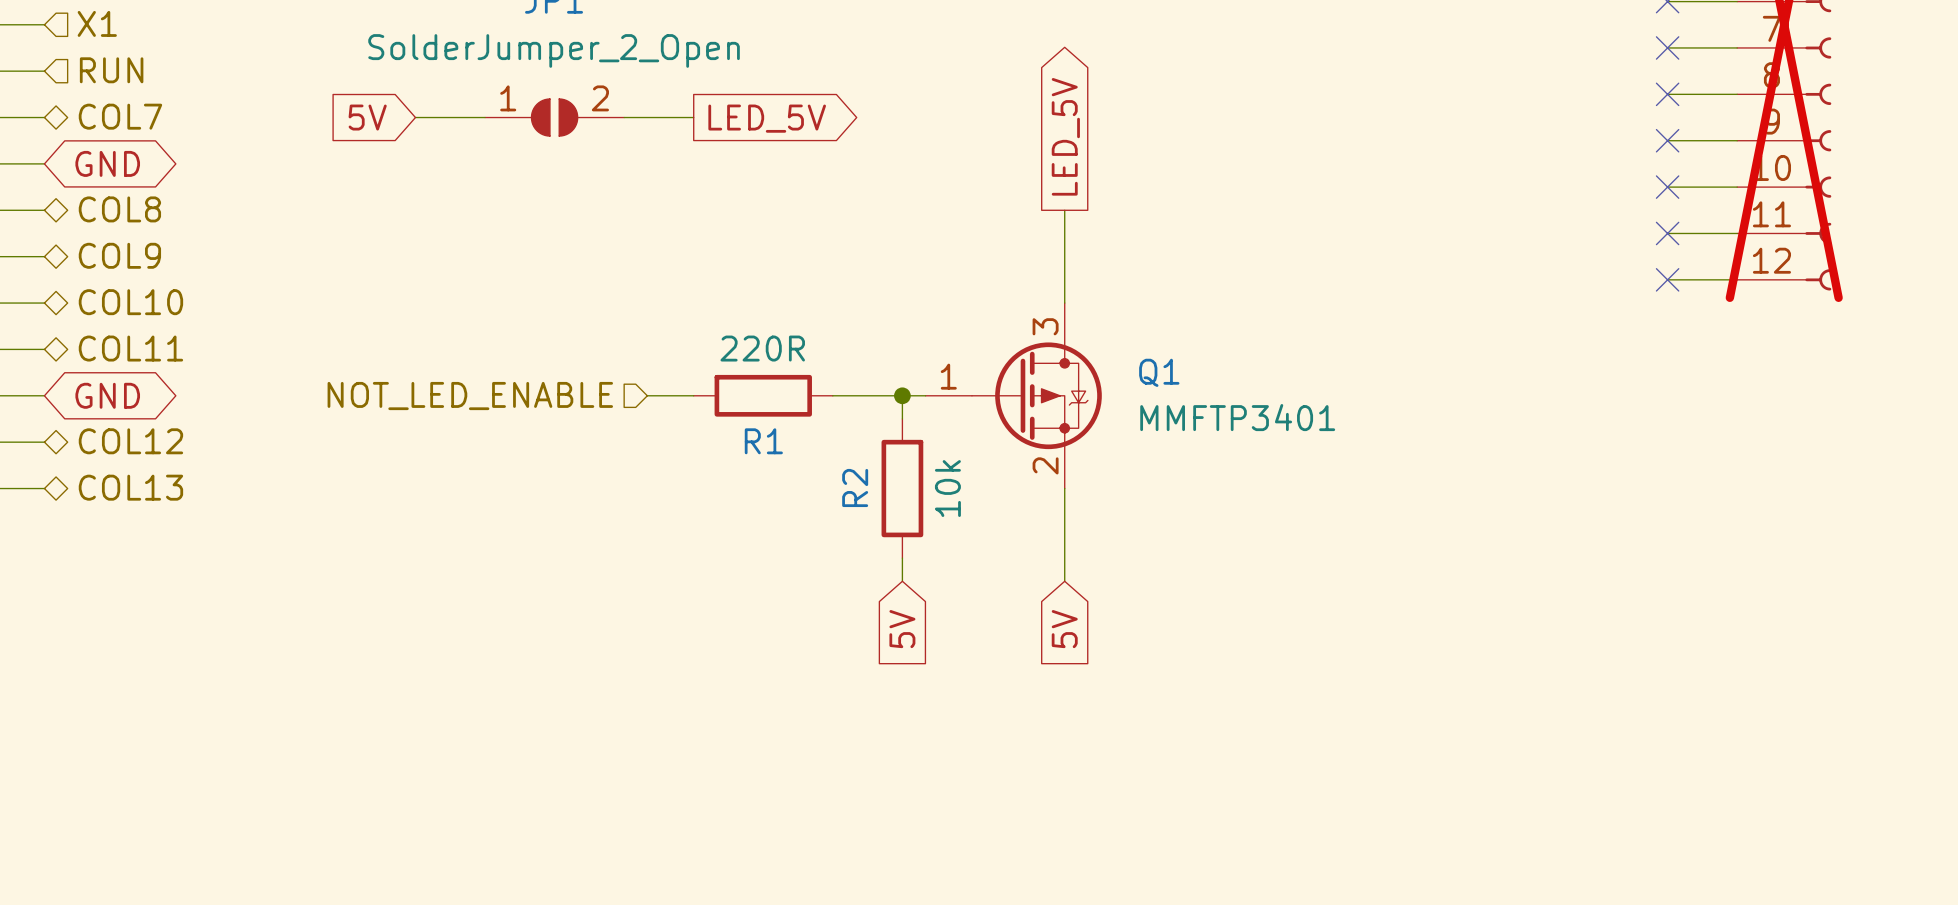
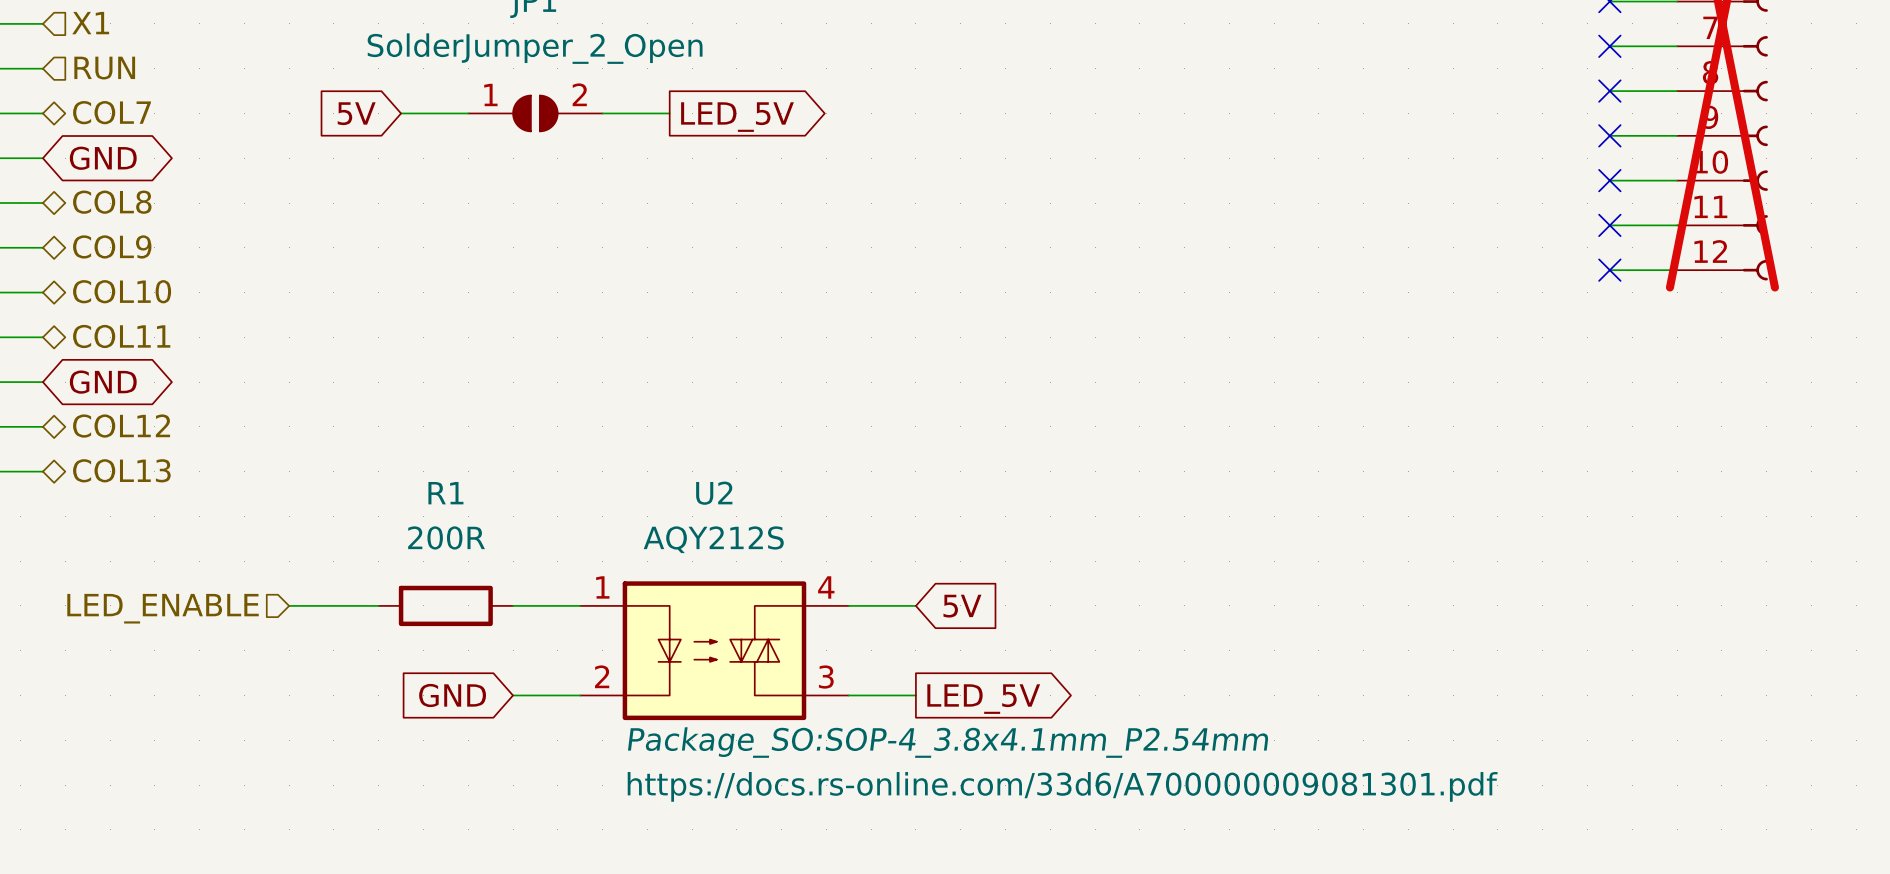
global label: LED_5V (1065, 136) -> none
wire: (1064, 210) (1064, 303) -> none
R1 value: 220R (762, 348) -> 200R (446, 537)
wire: (647, 395) (693, 395) -> none
R1 position: (763, 395) -> (445, 605)
wire: (832, 395) (925, 395) -> none
wire: (902, 395) (902, 418) -> none
junction: (902, 395) -> none
Q1: MMFTP3401 (1013, 395) -> none
hierarchical label: NOT_LED_ENABLE (470, 396) -> none
R1 name position: R1 (763, 441) -> R1 (445, 493)
R2: 10k (902, 488) -> none
wire: (1064, 488) (1064, 581) -> none
wire: (902, 558) (902, 581) -> none
hierarchical label: none -> LED_ENABLE (163, 608)
wire: none -> (289, 605) (378, 605)
wire: none -> (513, 605) (580, 605)
wire: none -> (848, 605) (915, 605)
global label: 5V (902, 629) -> none
global label rotation: 0° (1064, 629) -> 90° counterclockwise (962, 606)
U2: none -> AQY212S (714, 650)
global label: none -> GND (452, 695)
wire: none -> (513, 695) (580, 695)
wire: none -> (848, 695) (915, 695)
global label: none -> LED_5V (983, 699)

